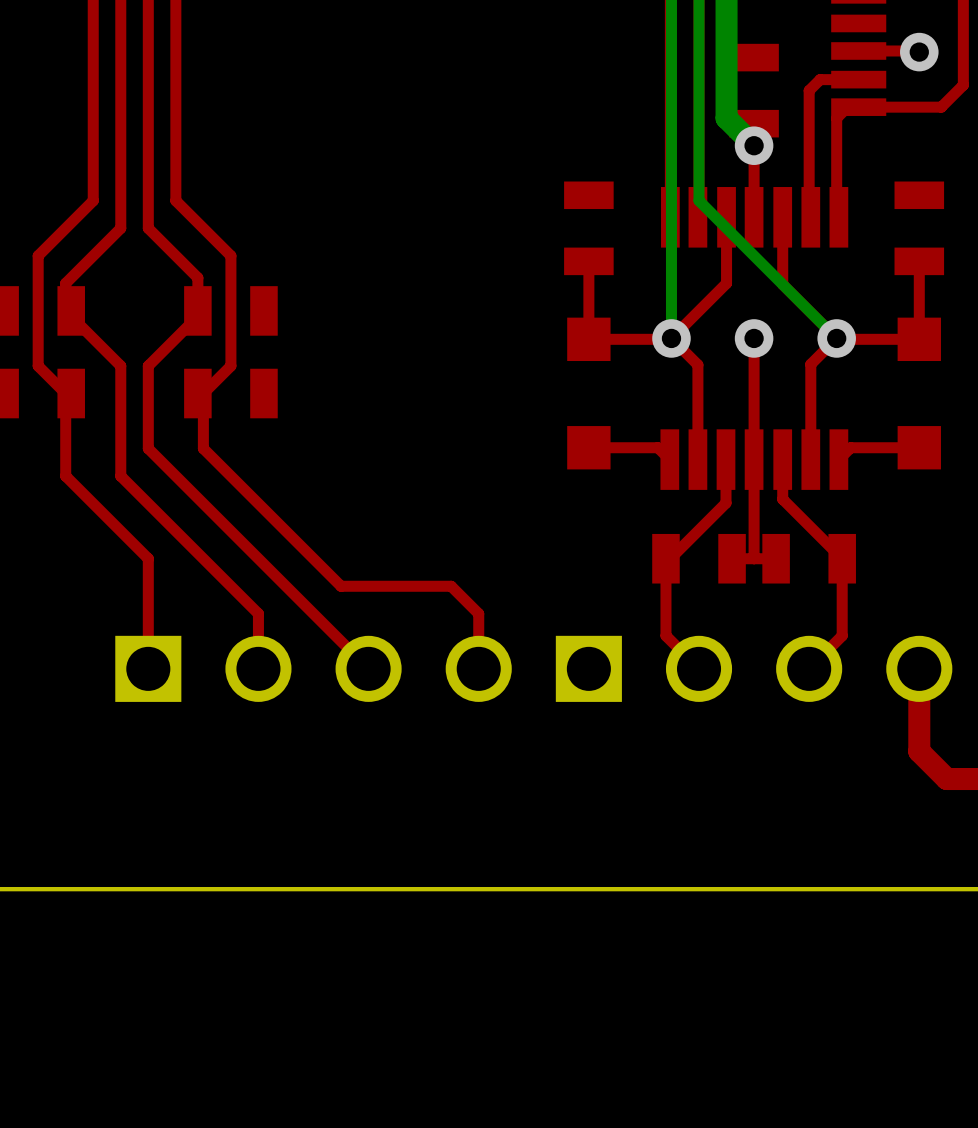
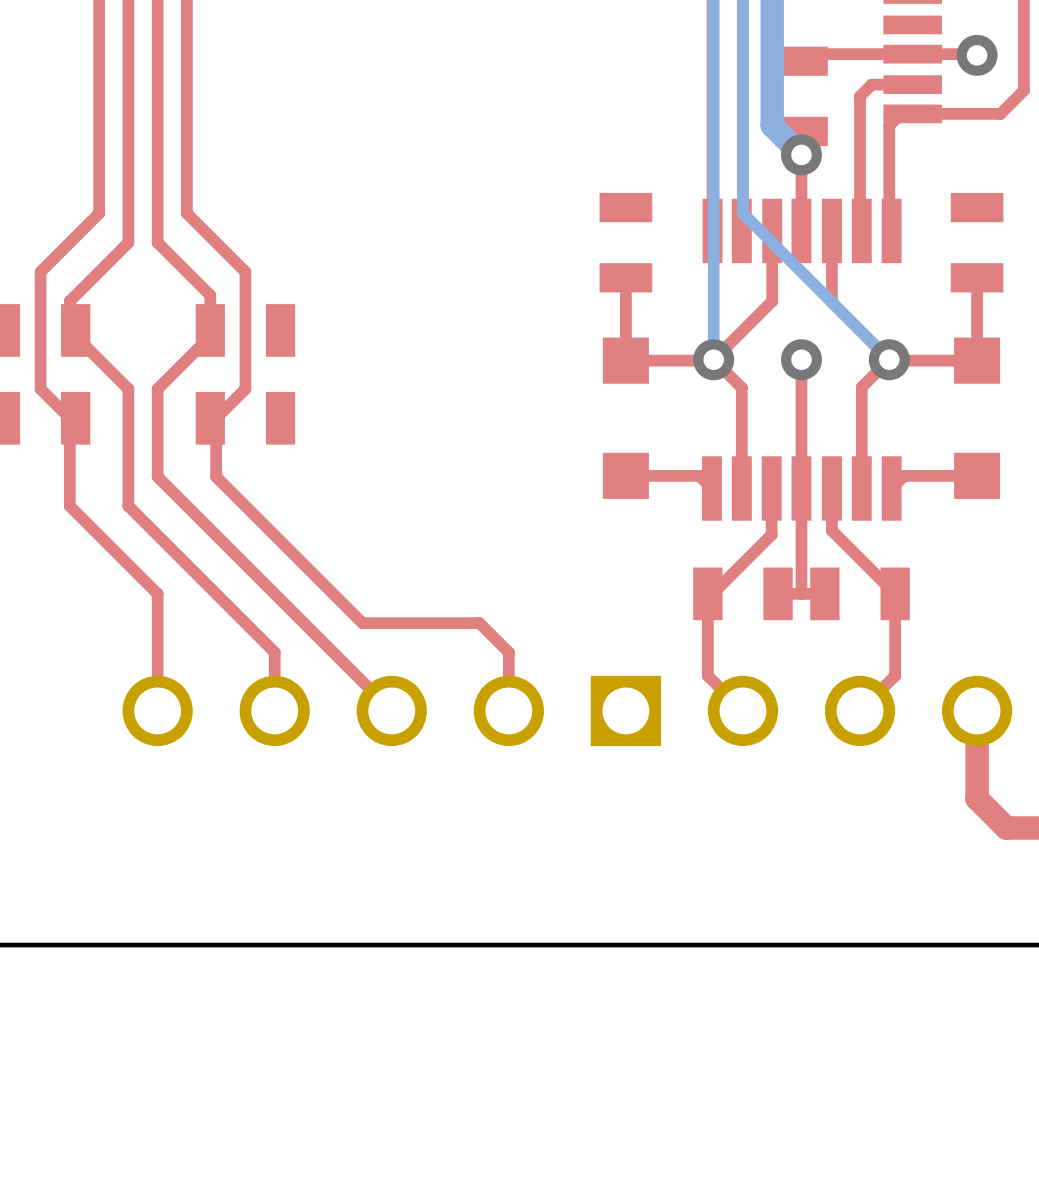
top track: none -> (912, 54) (808, 54) (801, 61)
part footprint: [115, 635, 512, 702] -> [122, 675, 544, 747]

